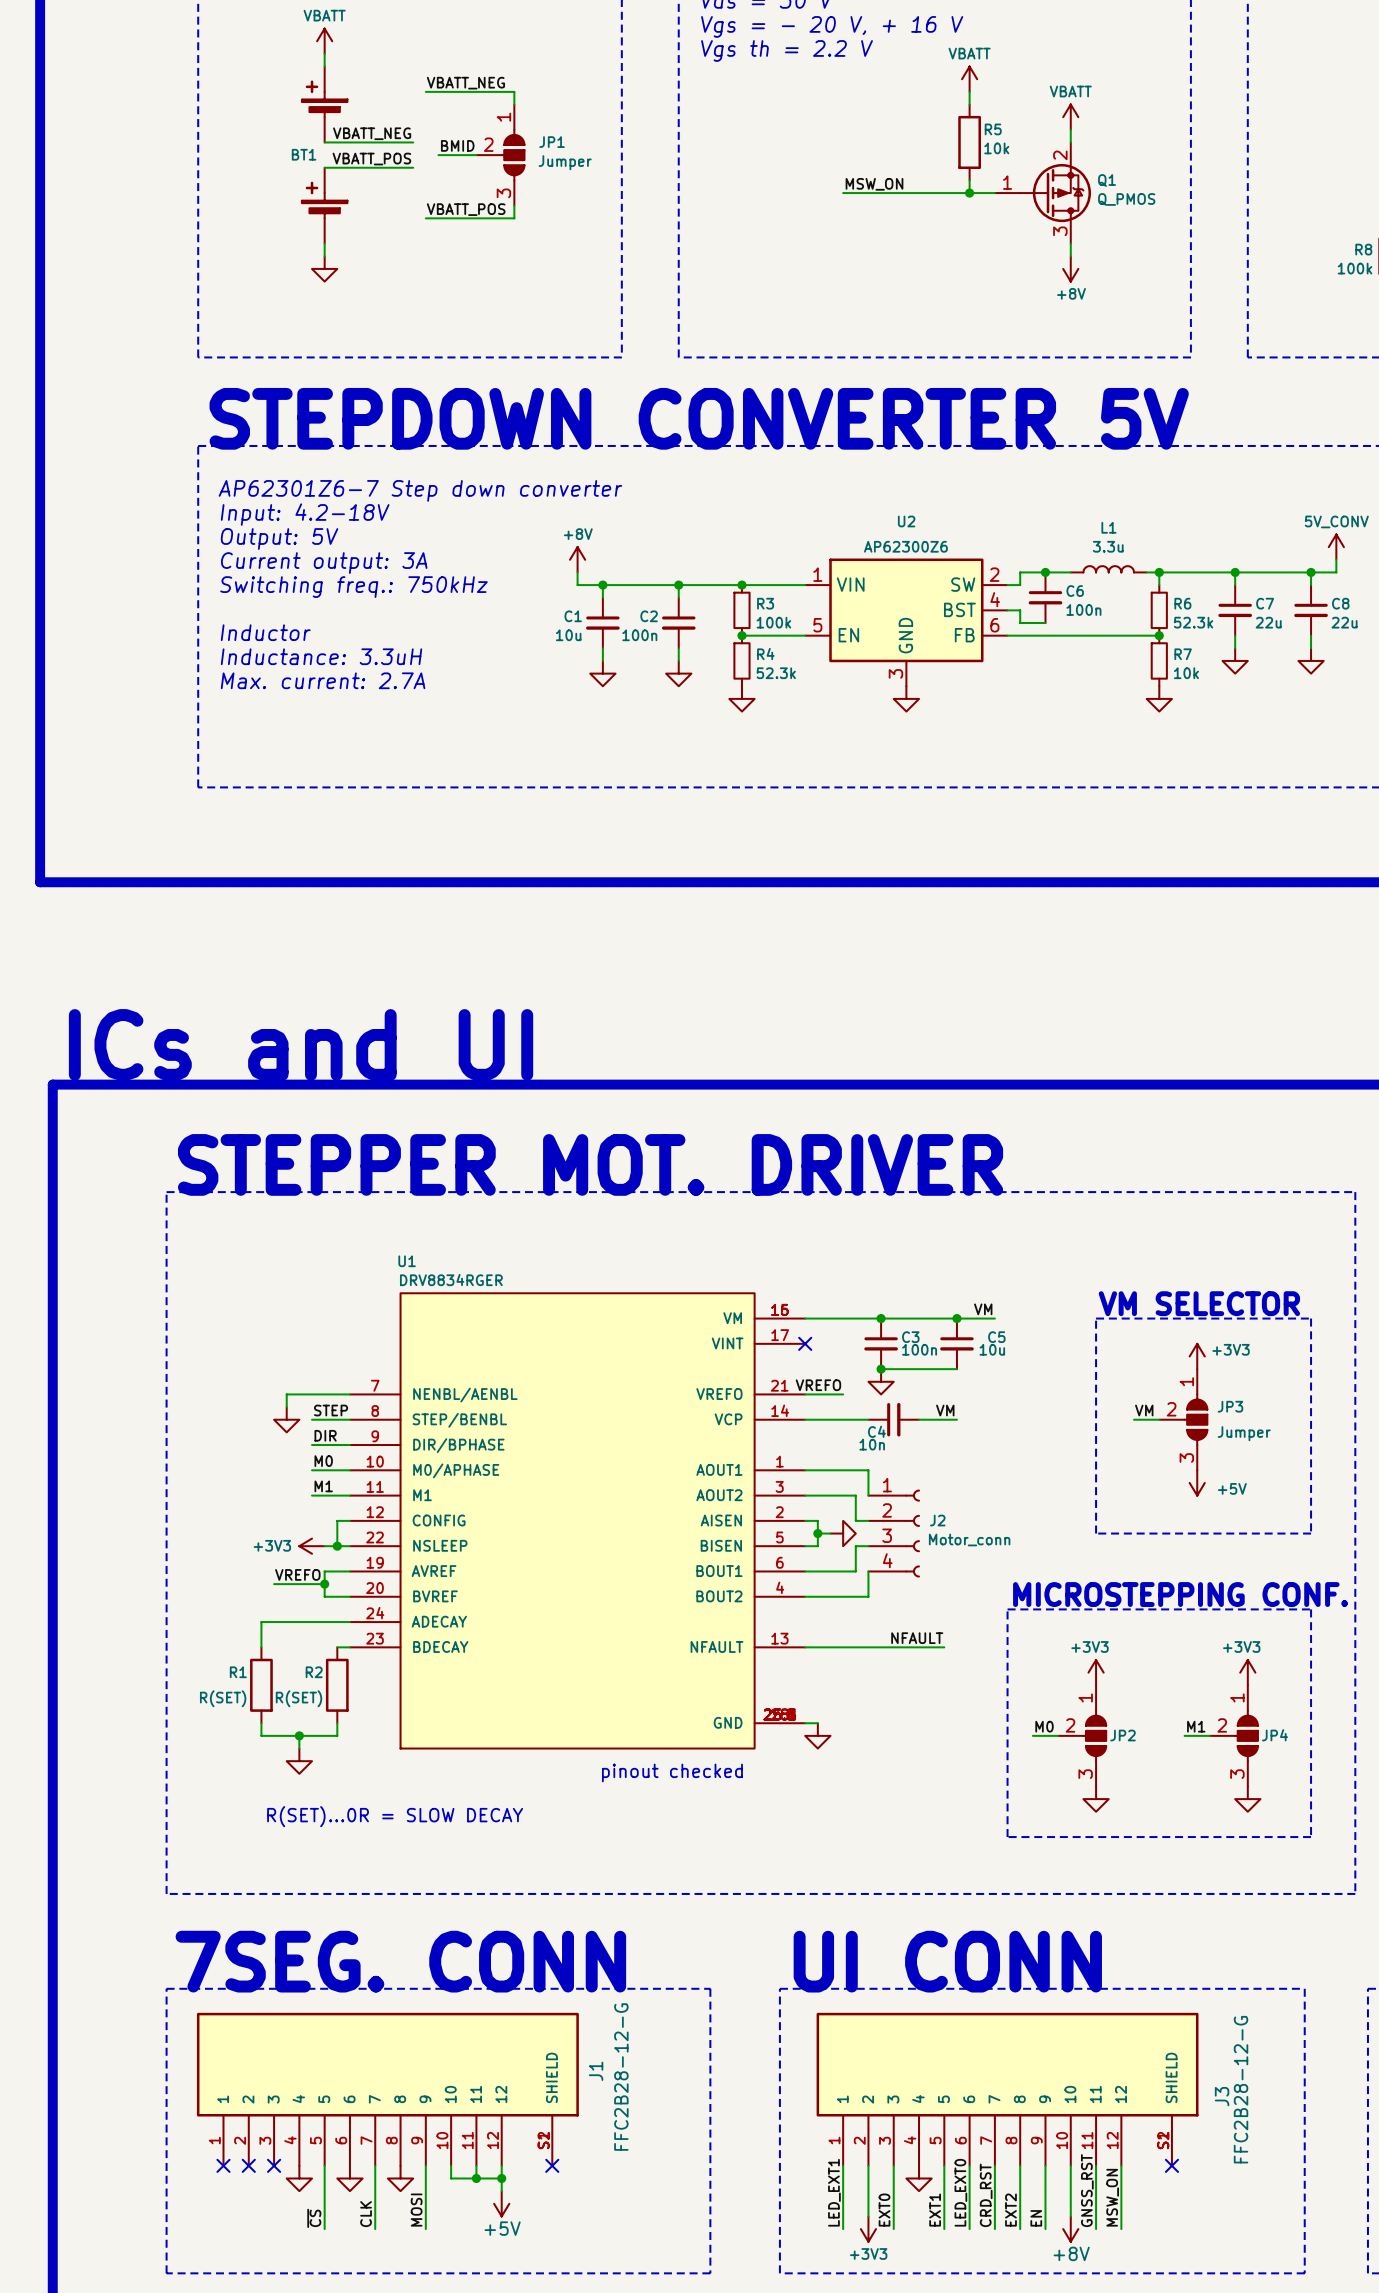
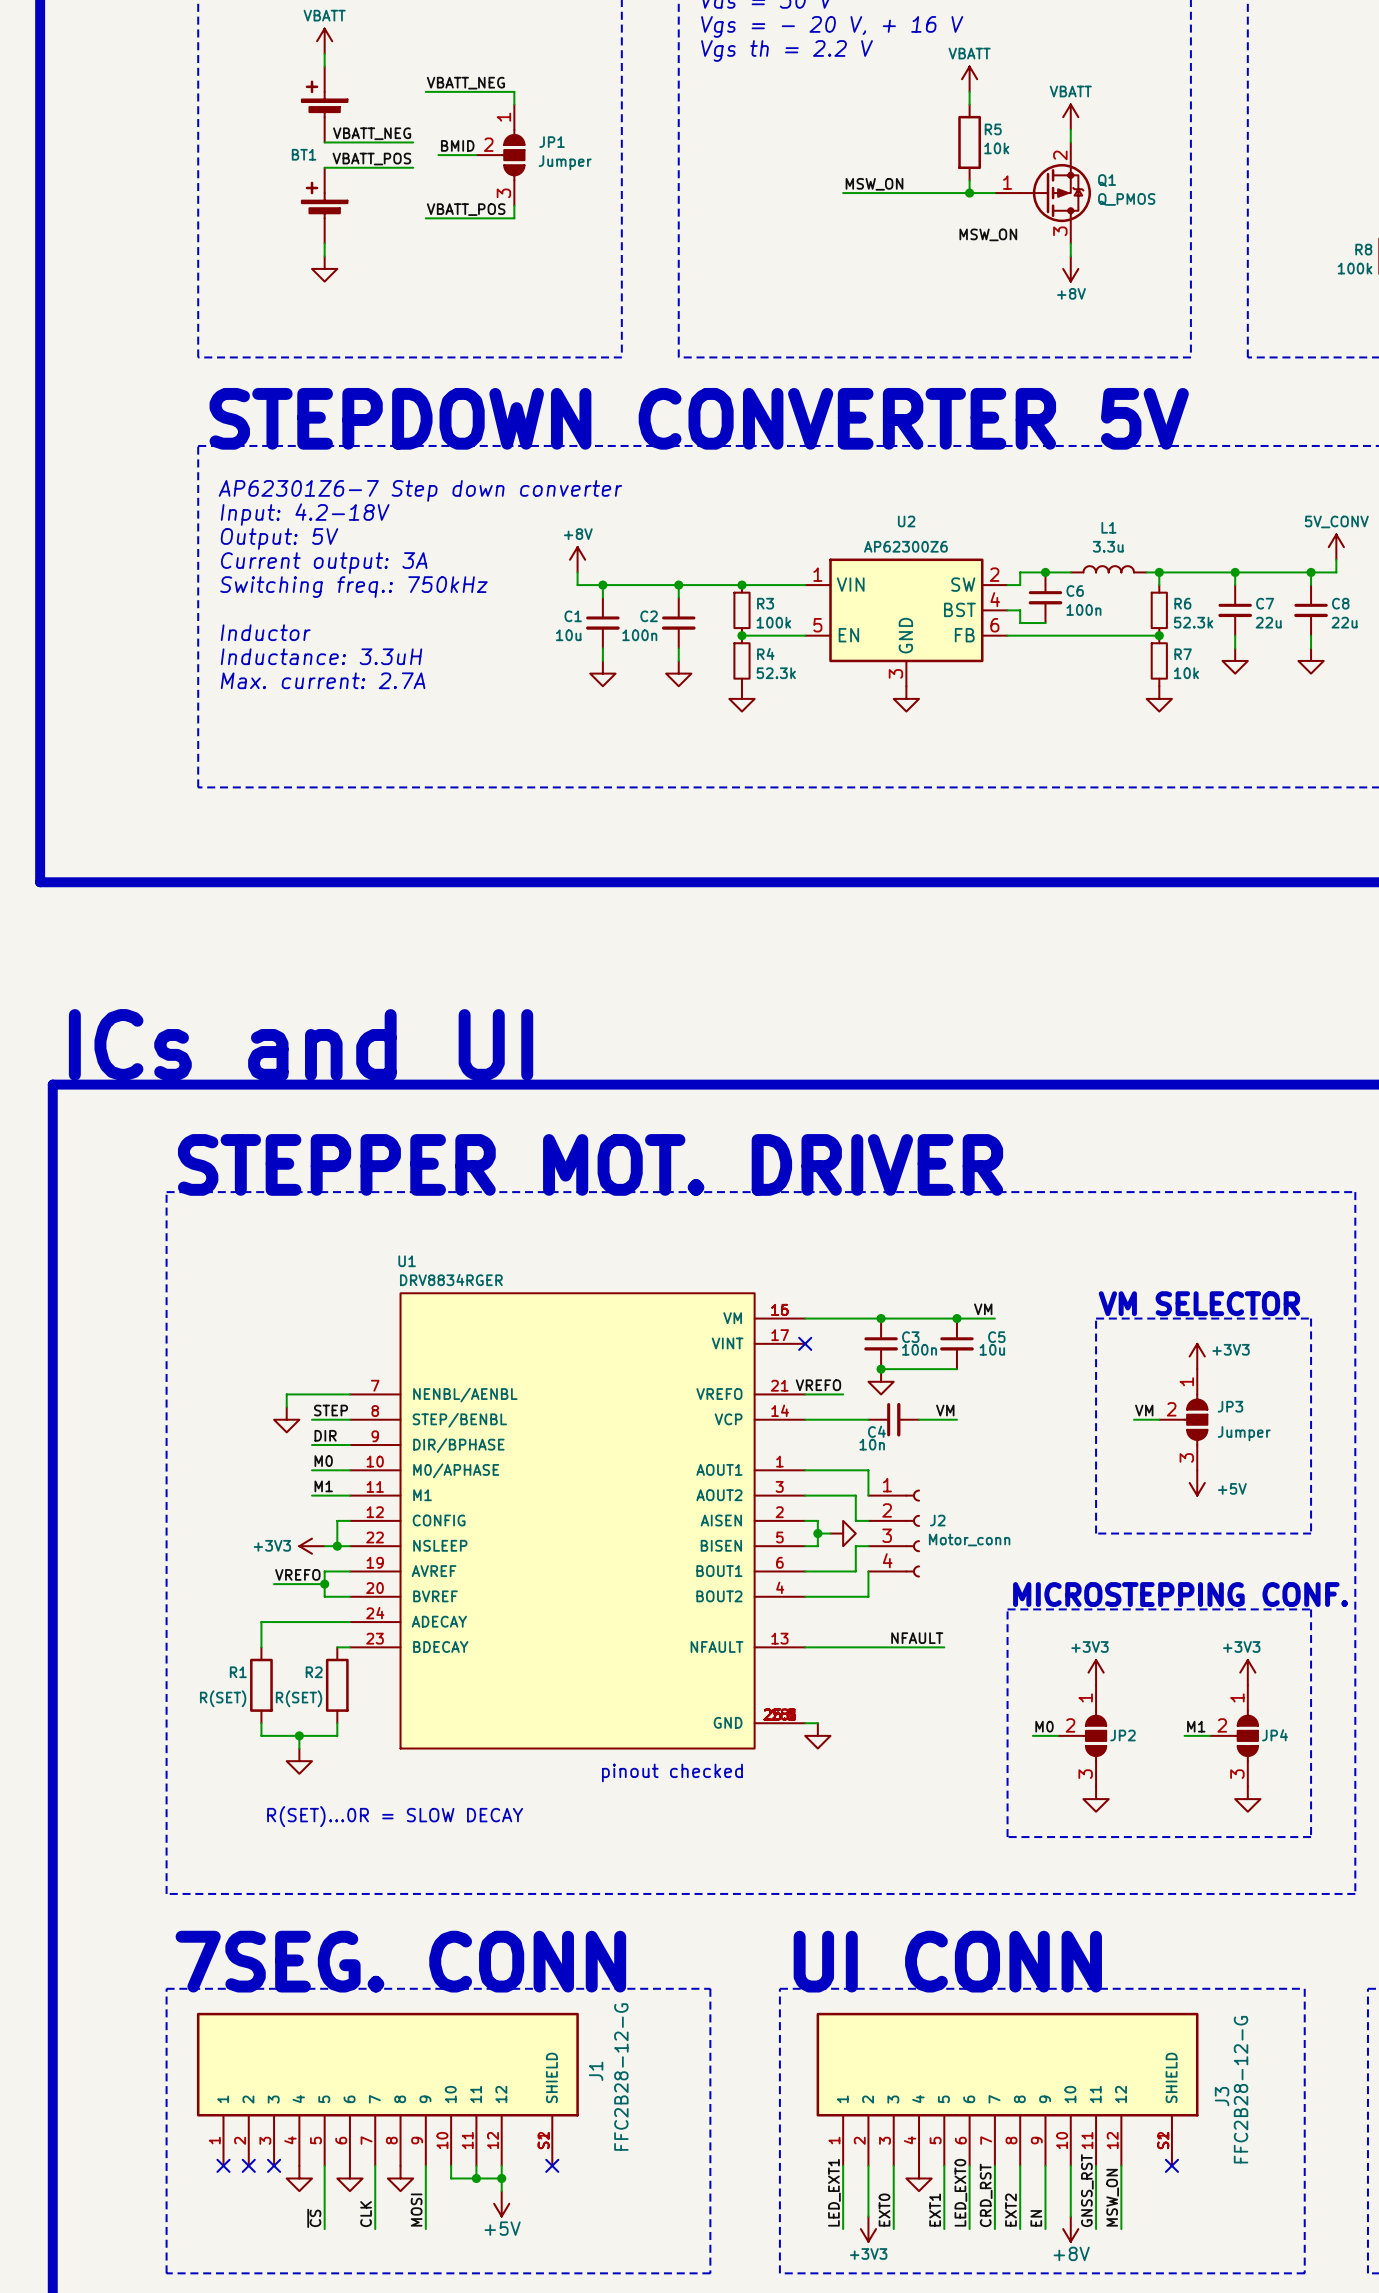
label: none -> MSW_ON (988, 234)

